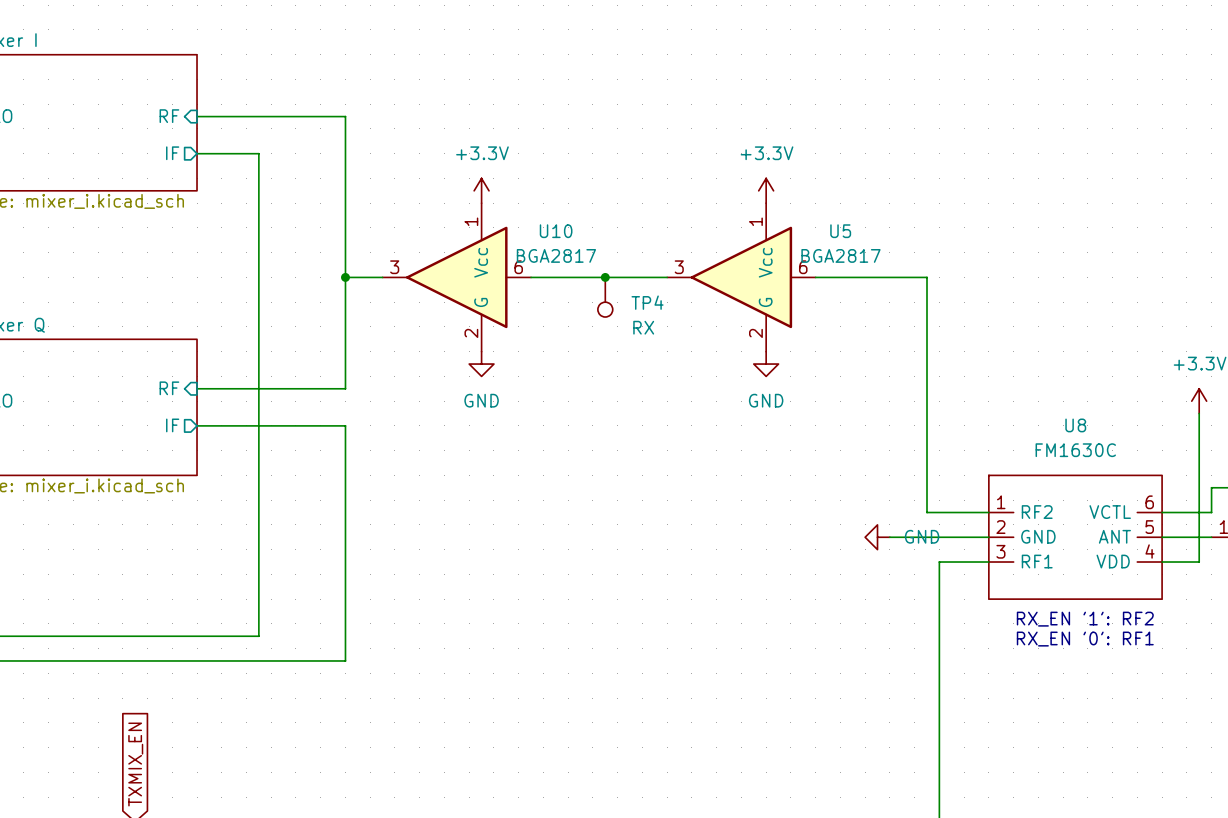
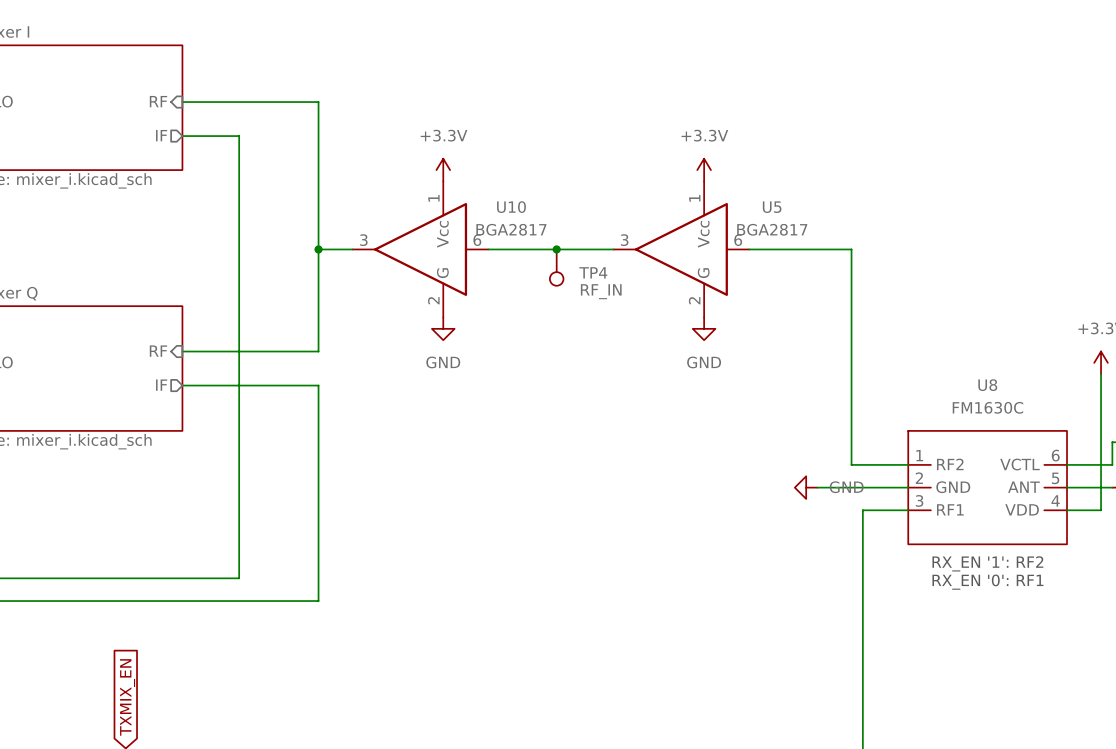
TP4 value: RX (643, 327) -> RF_IN (601, 291)

